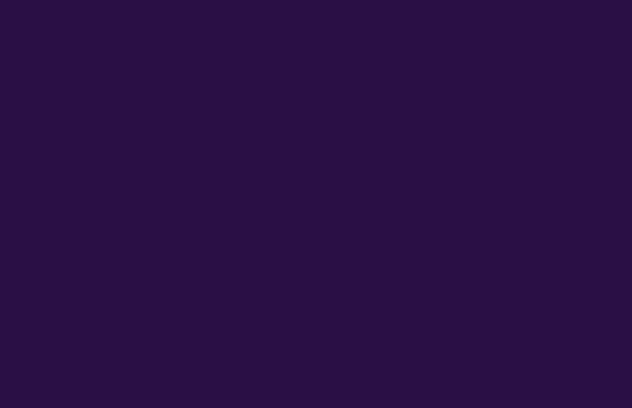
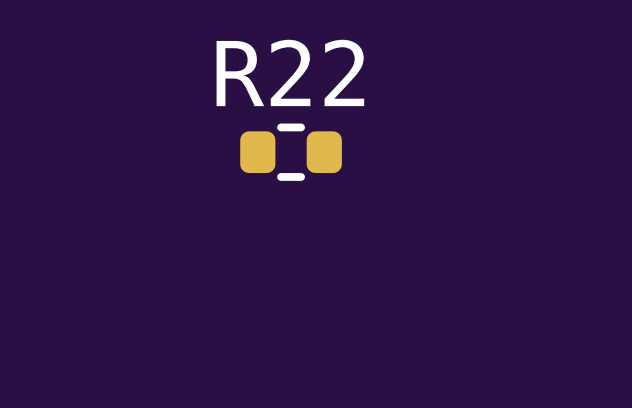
R22: none -> (291, 152)

